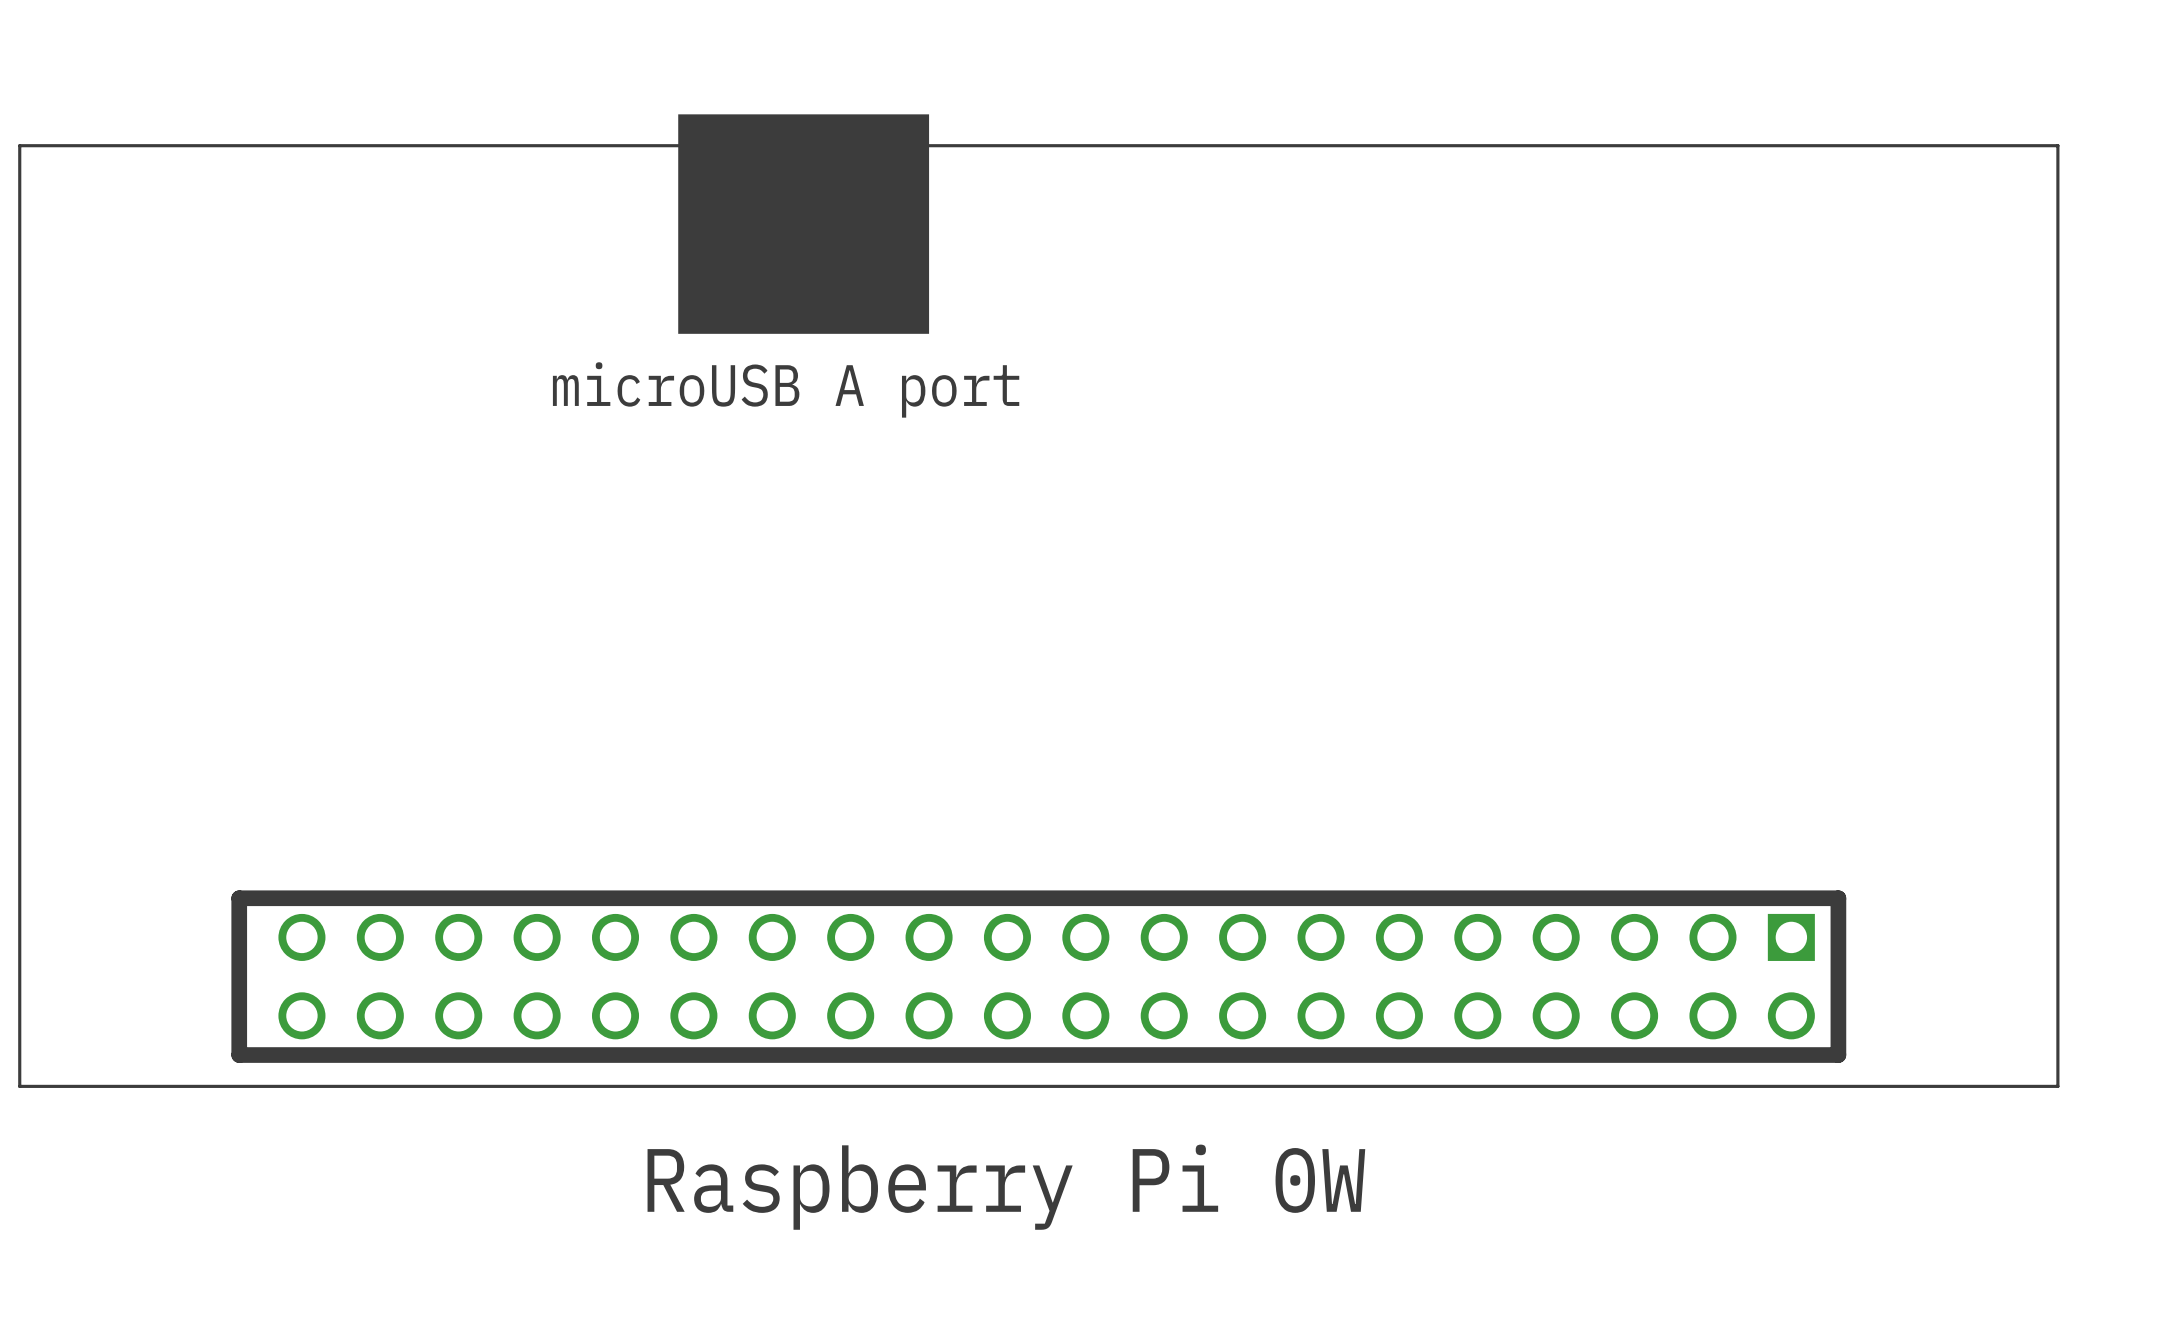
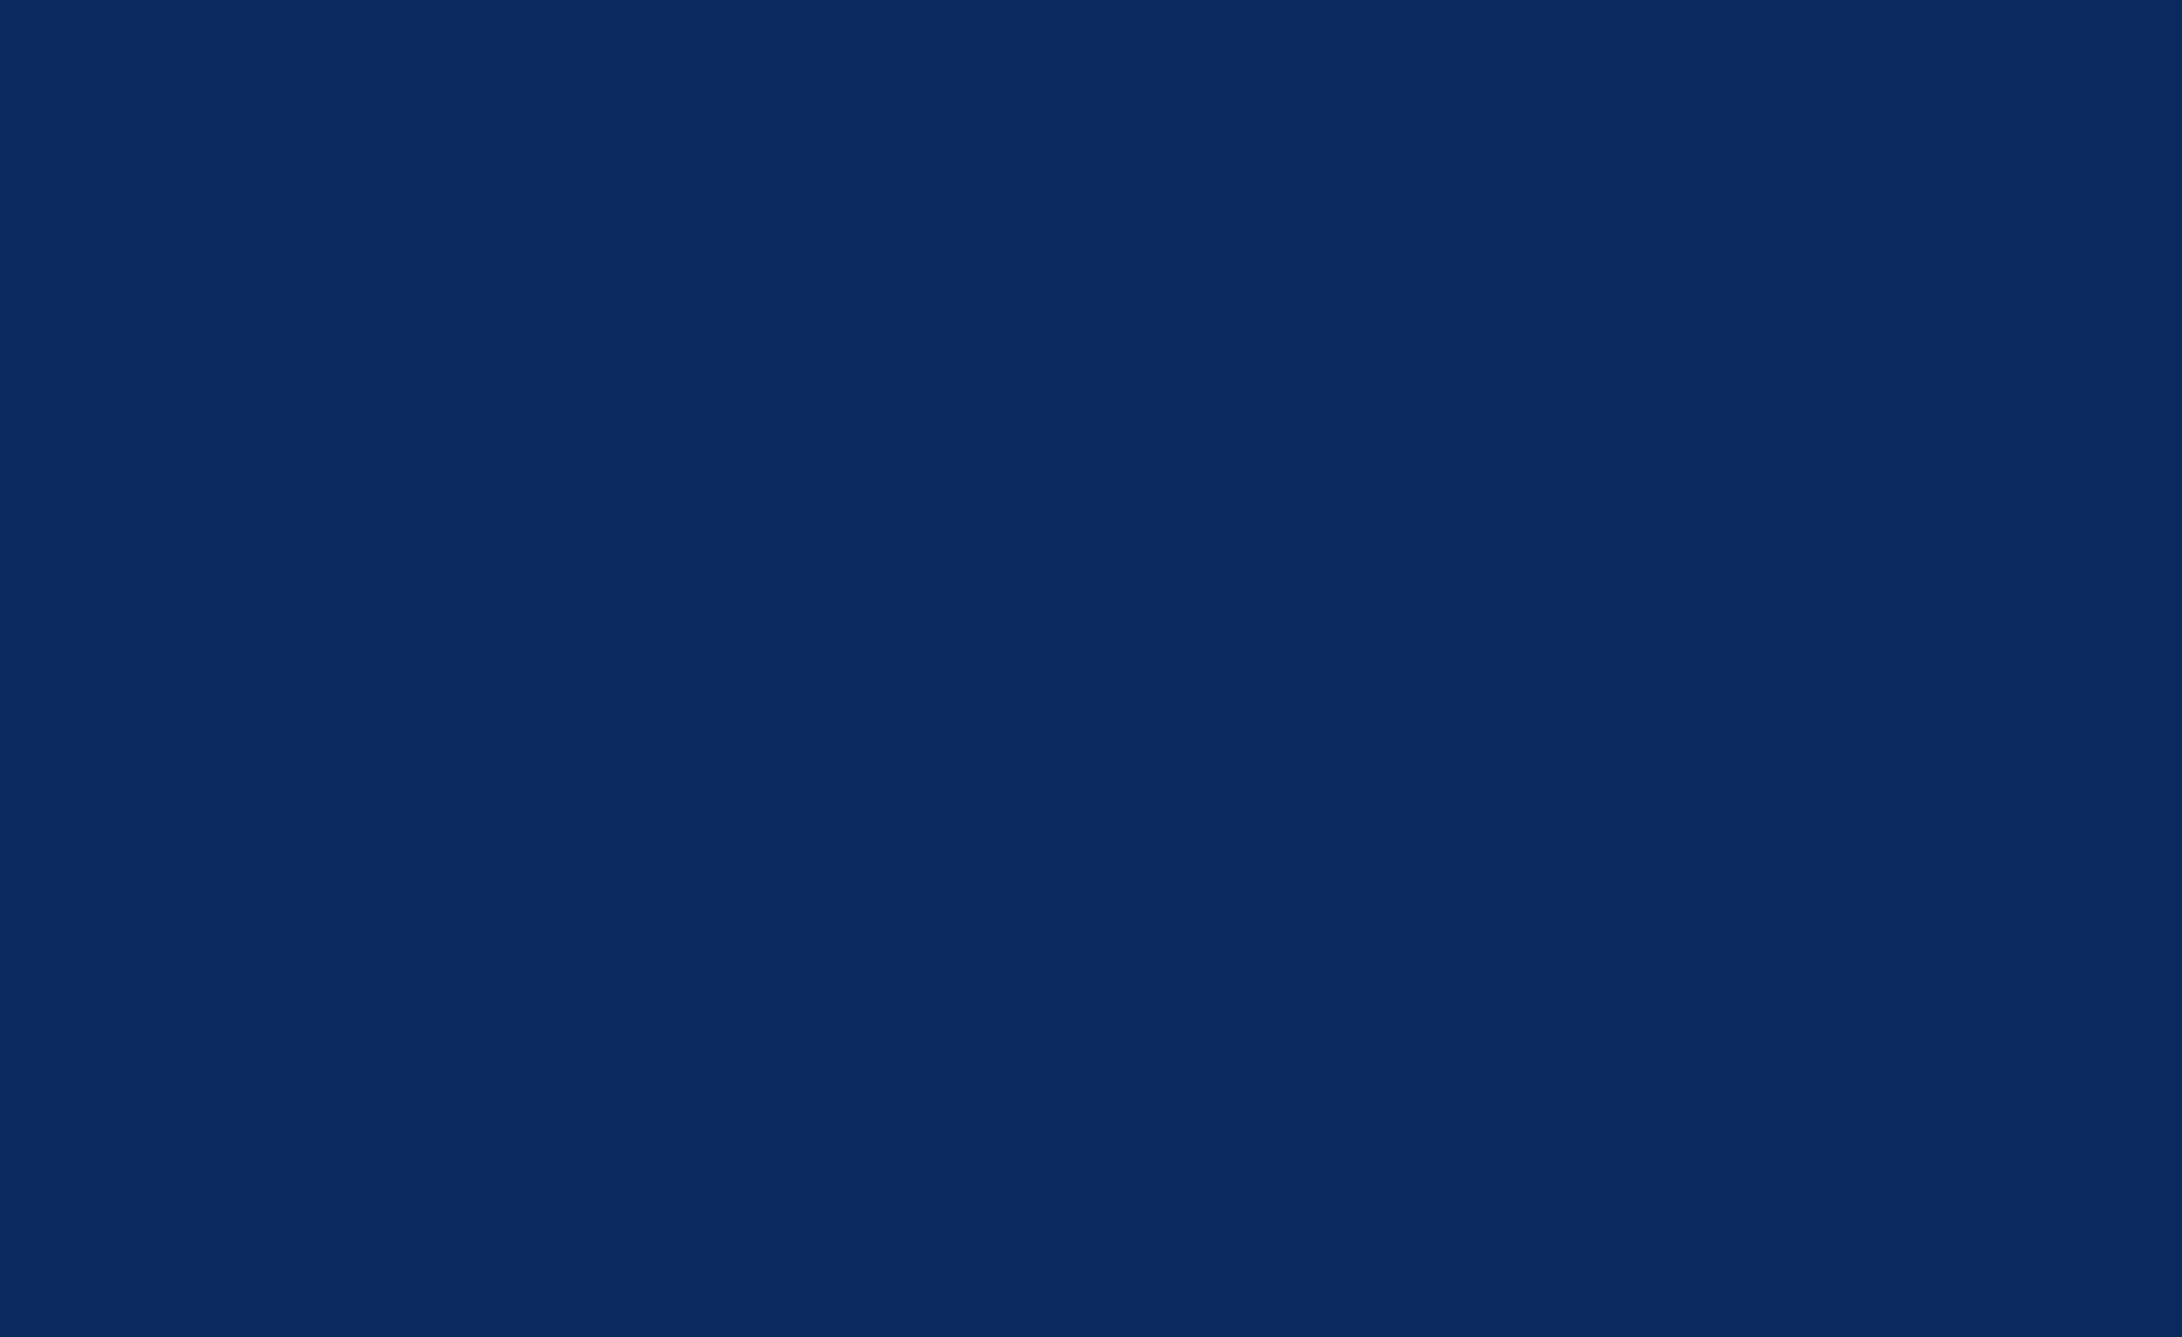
part: (1038, 601) -> none

